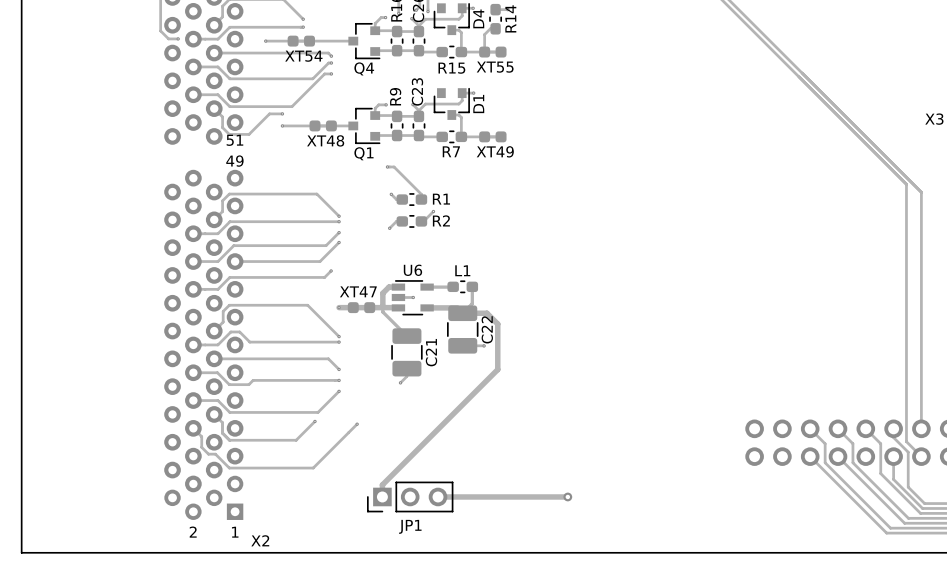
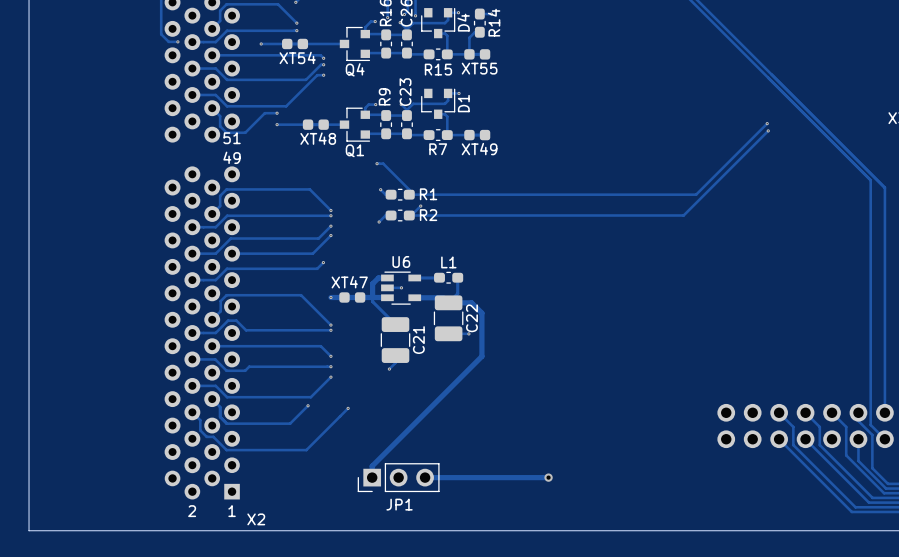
track: none -> (767, 123) (696, 194) (409, 194)
via: none -> (767, 123)
track: none -> (768, 130) (683, 215) (411, 215)
via: none -> (768, 130)

